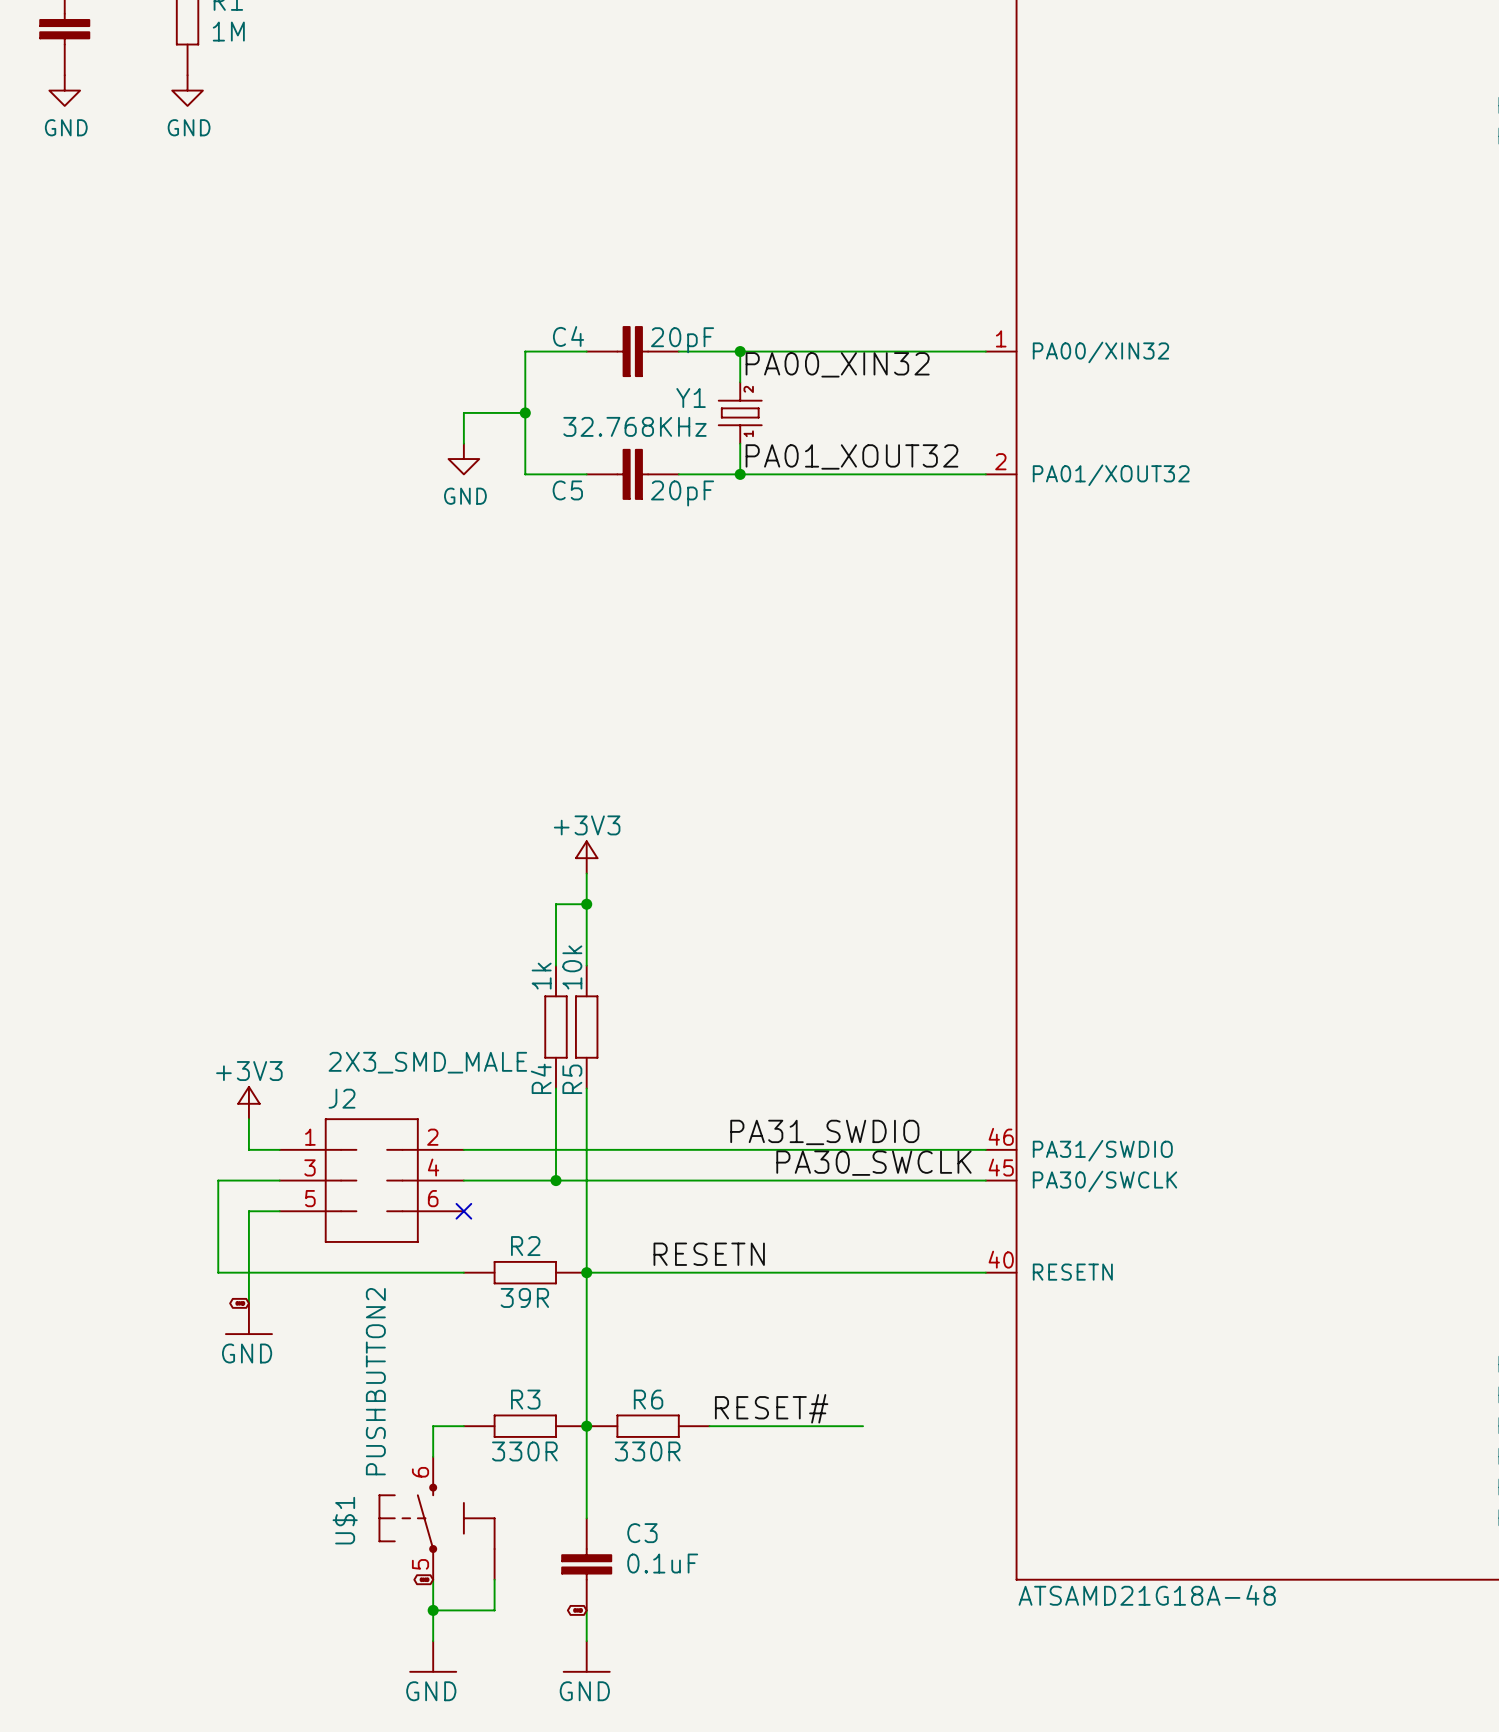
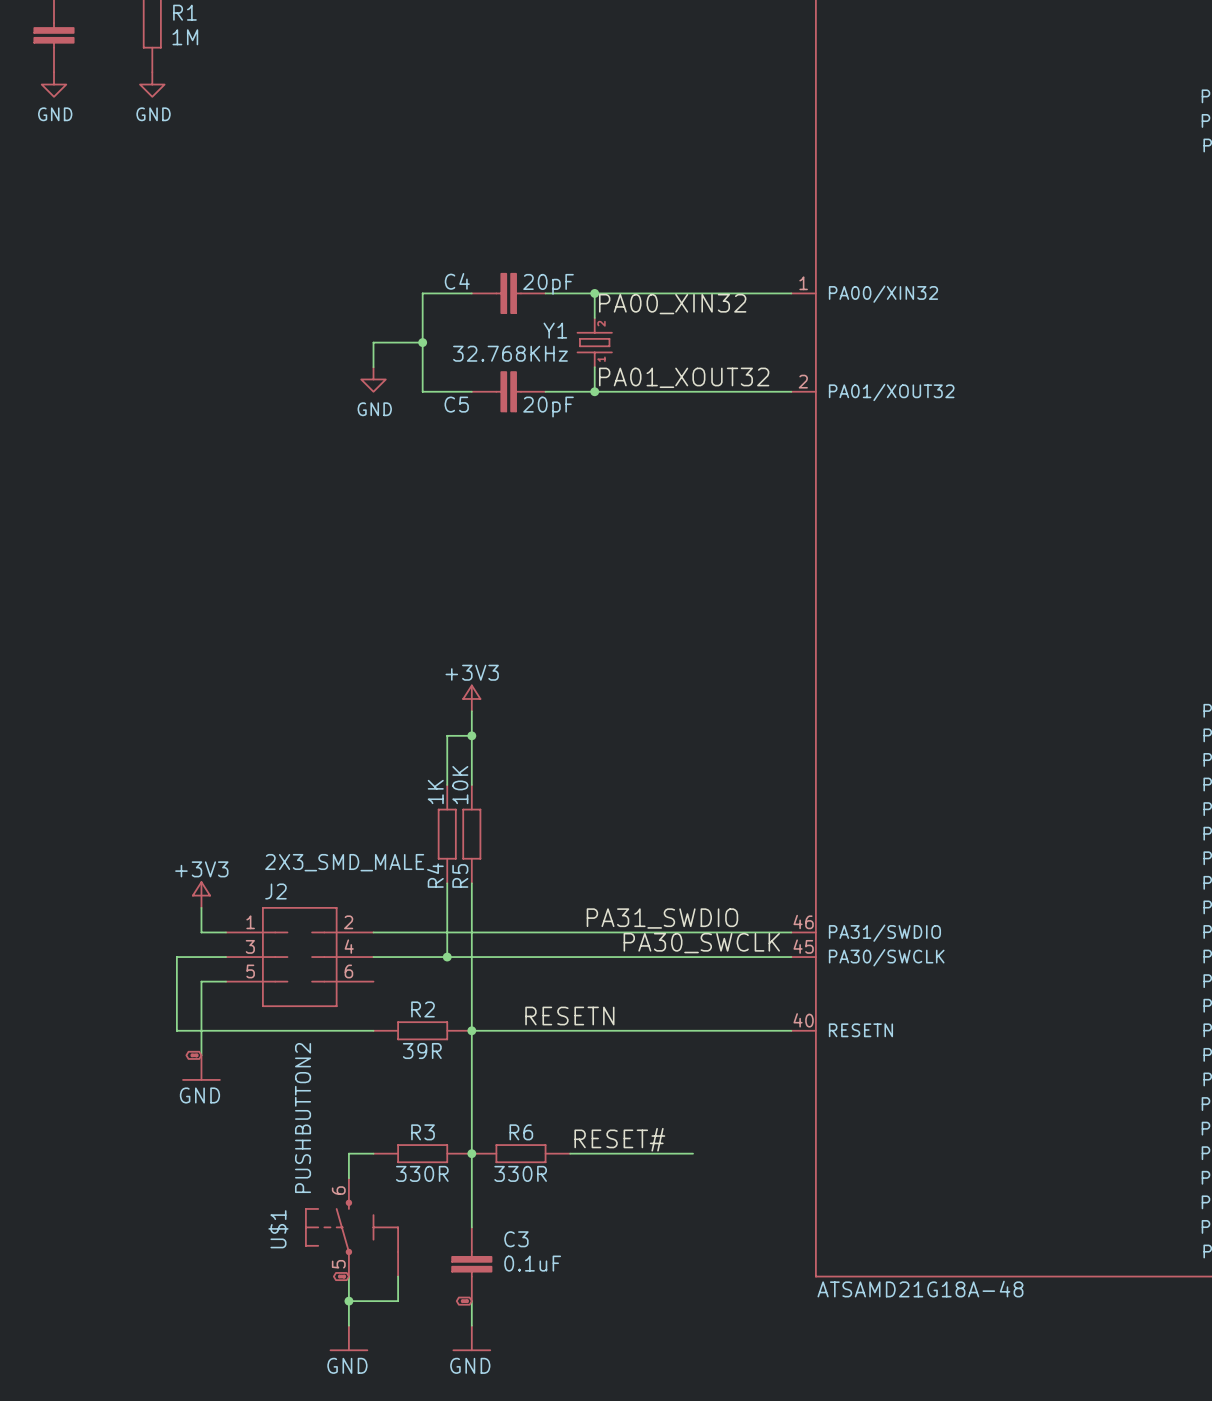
R5 value: 10k (572, 967) -> 10K (460, 785)
R4 value: 1k (541, 976) -> 1K (435, 791)
no-connect mark: (463, 1211) -> none

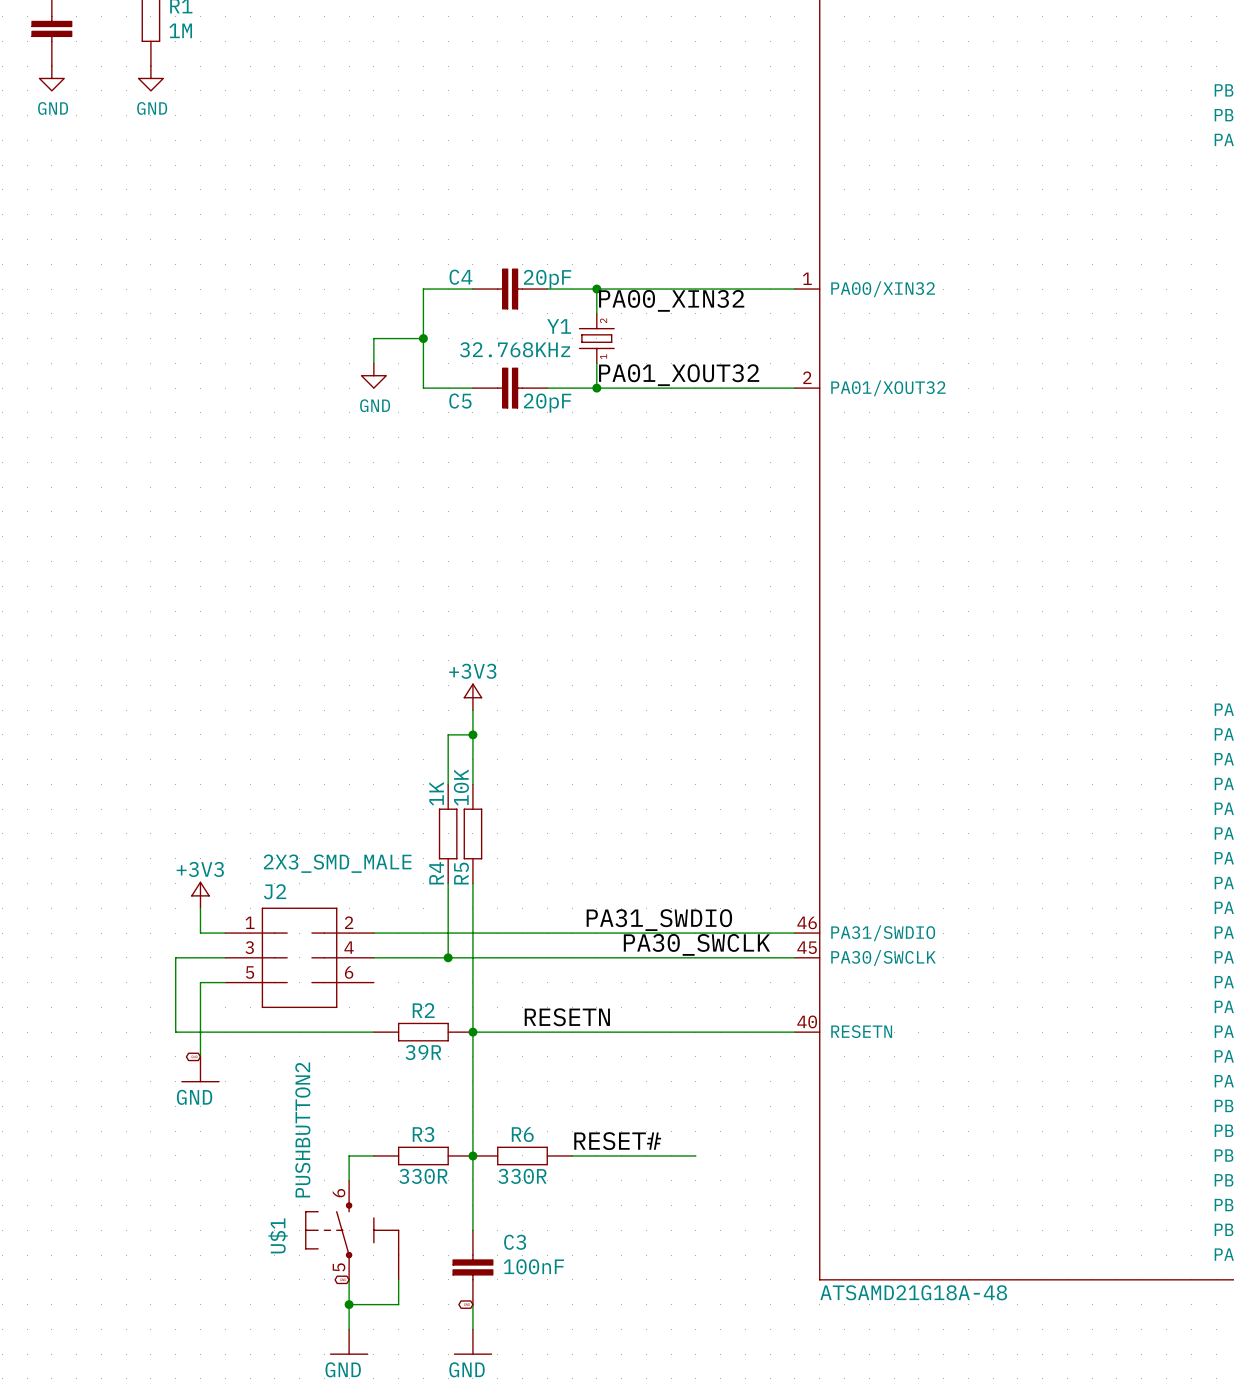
C3 value: 0.1uF (532, 1263) -> 100nF (533, 1266)

